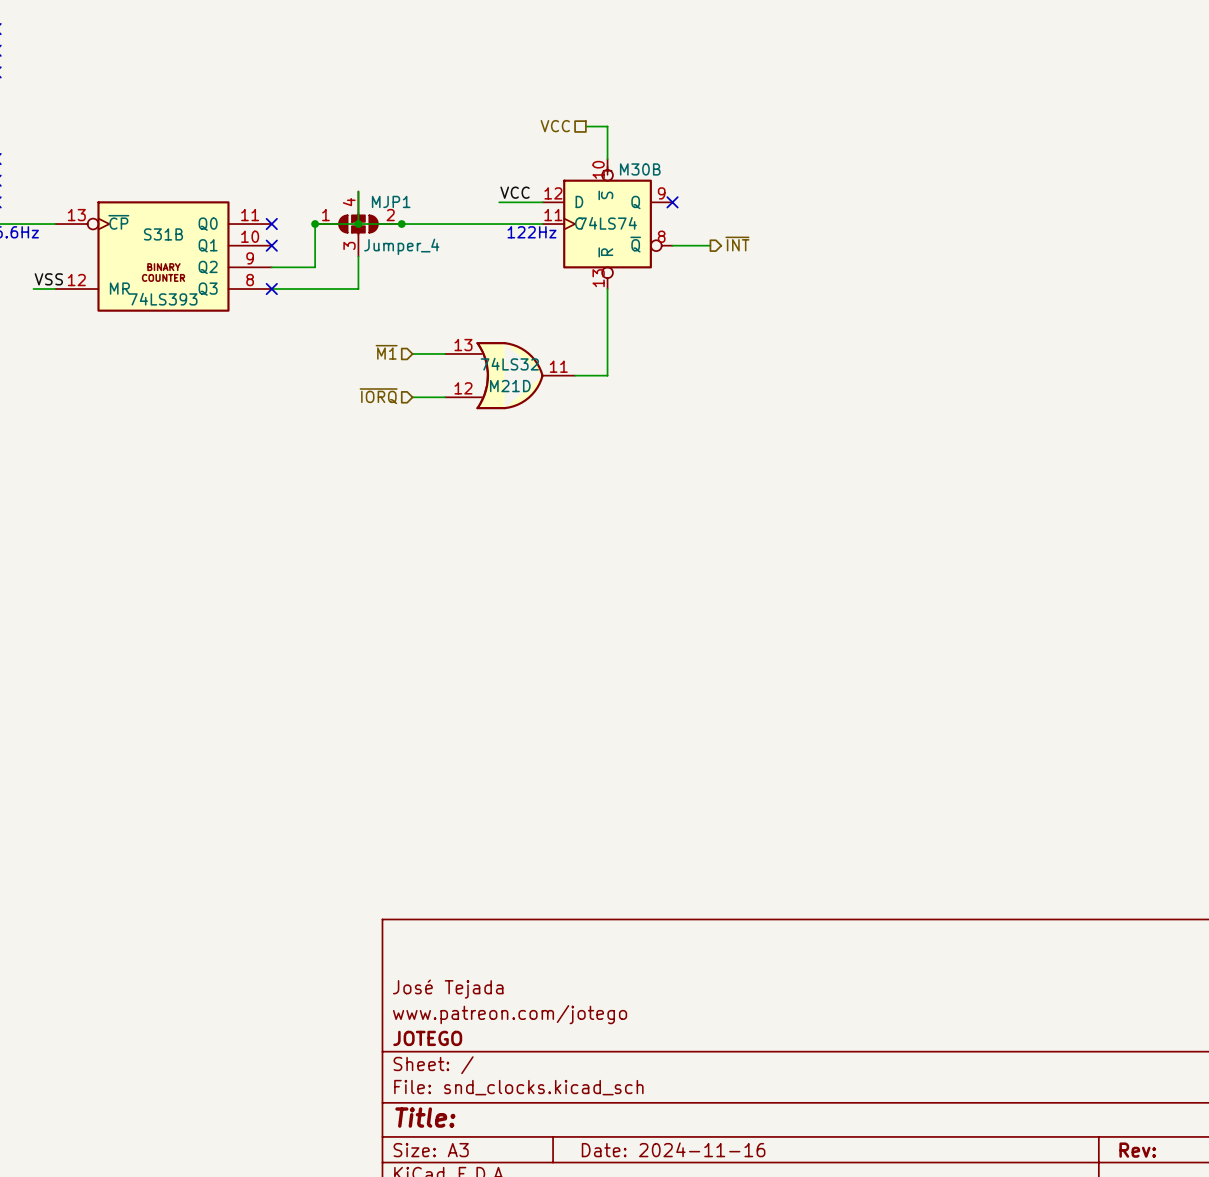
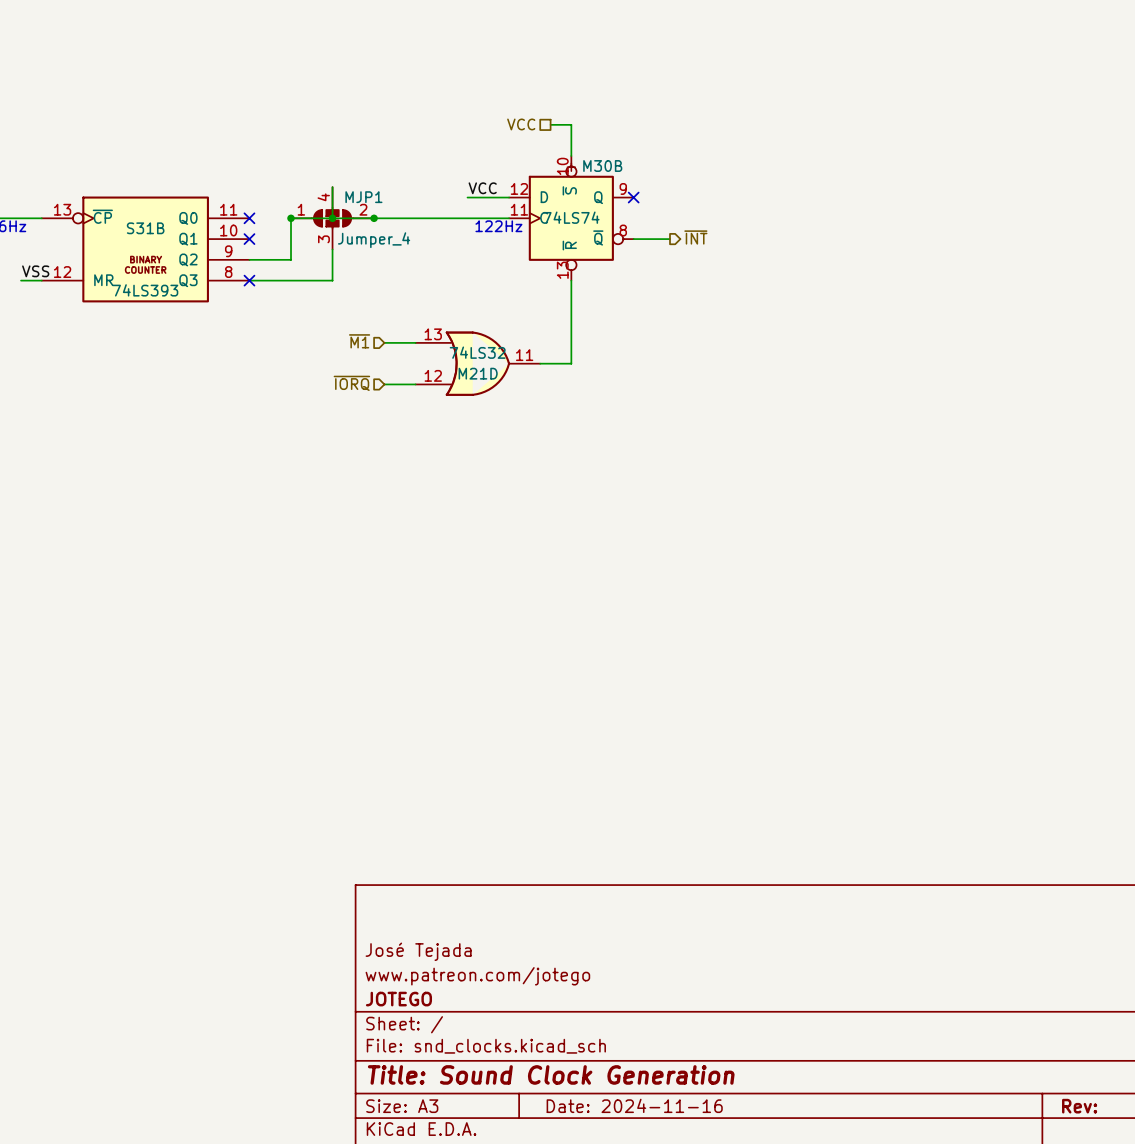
title block: Title: (425, 1117) -> Title: Sound Clock Generation (551, 1074)

